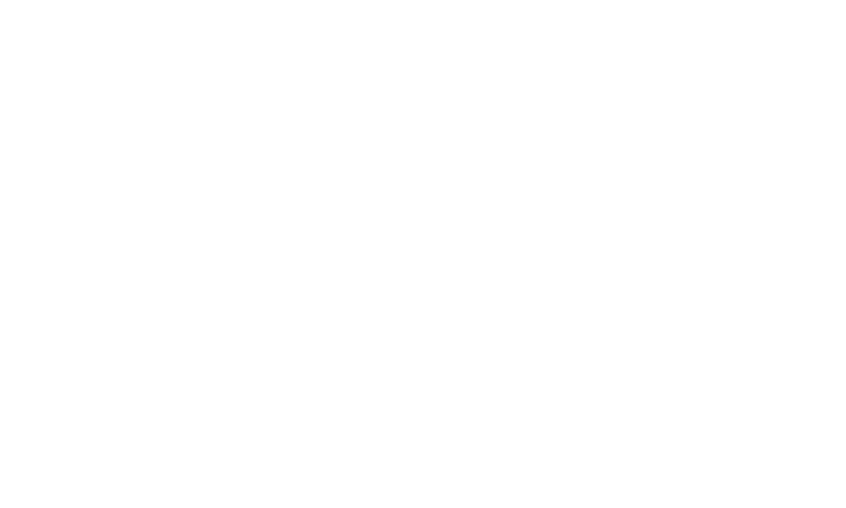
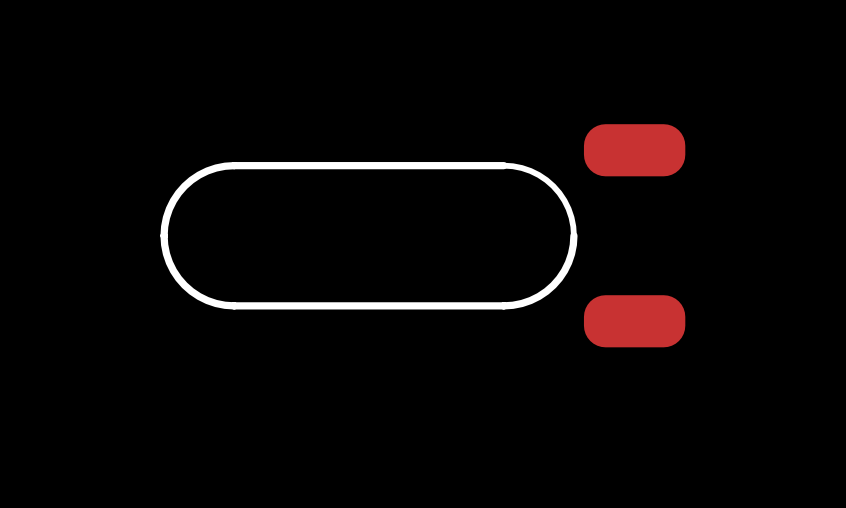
part: none -> (422, 235)

